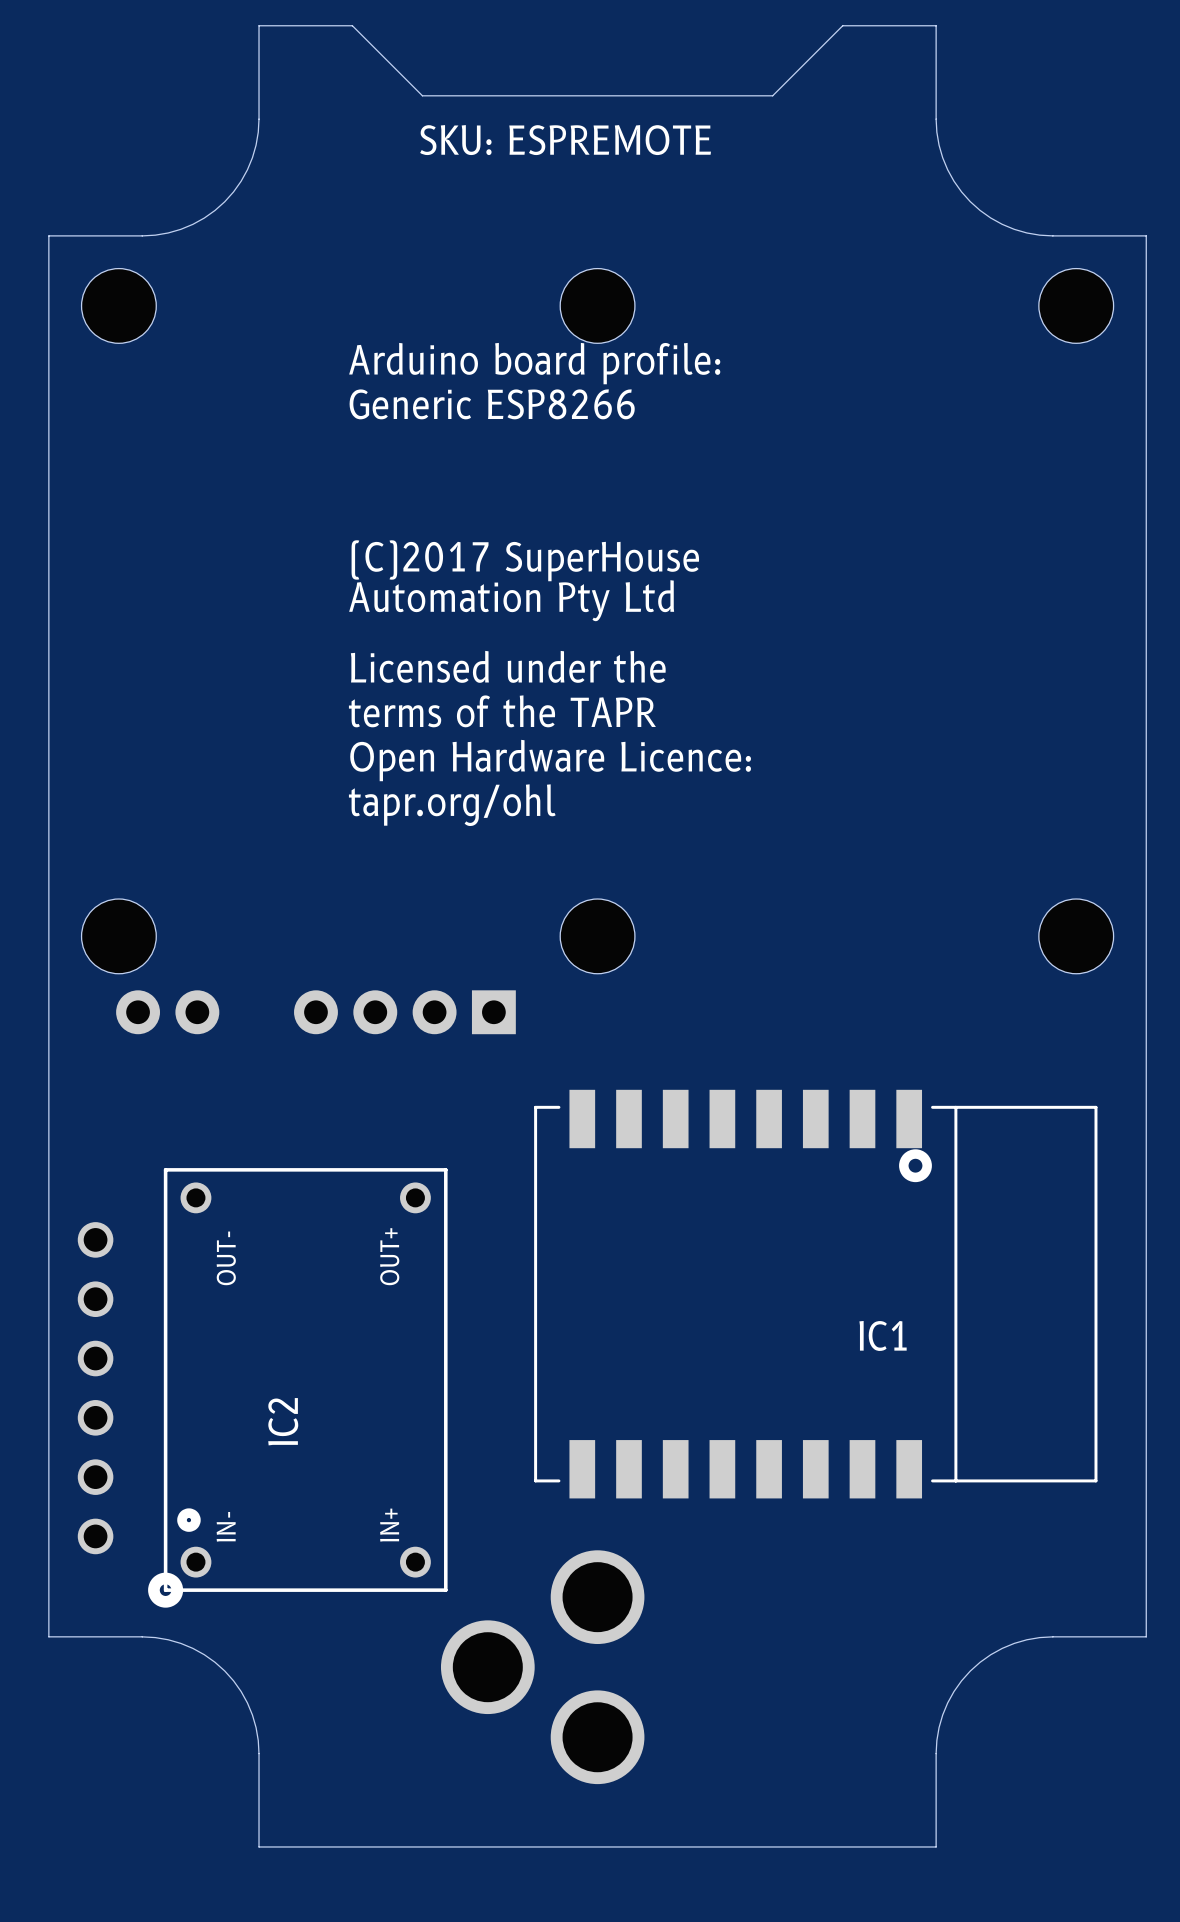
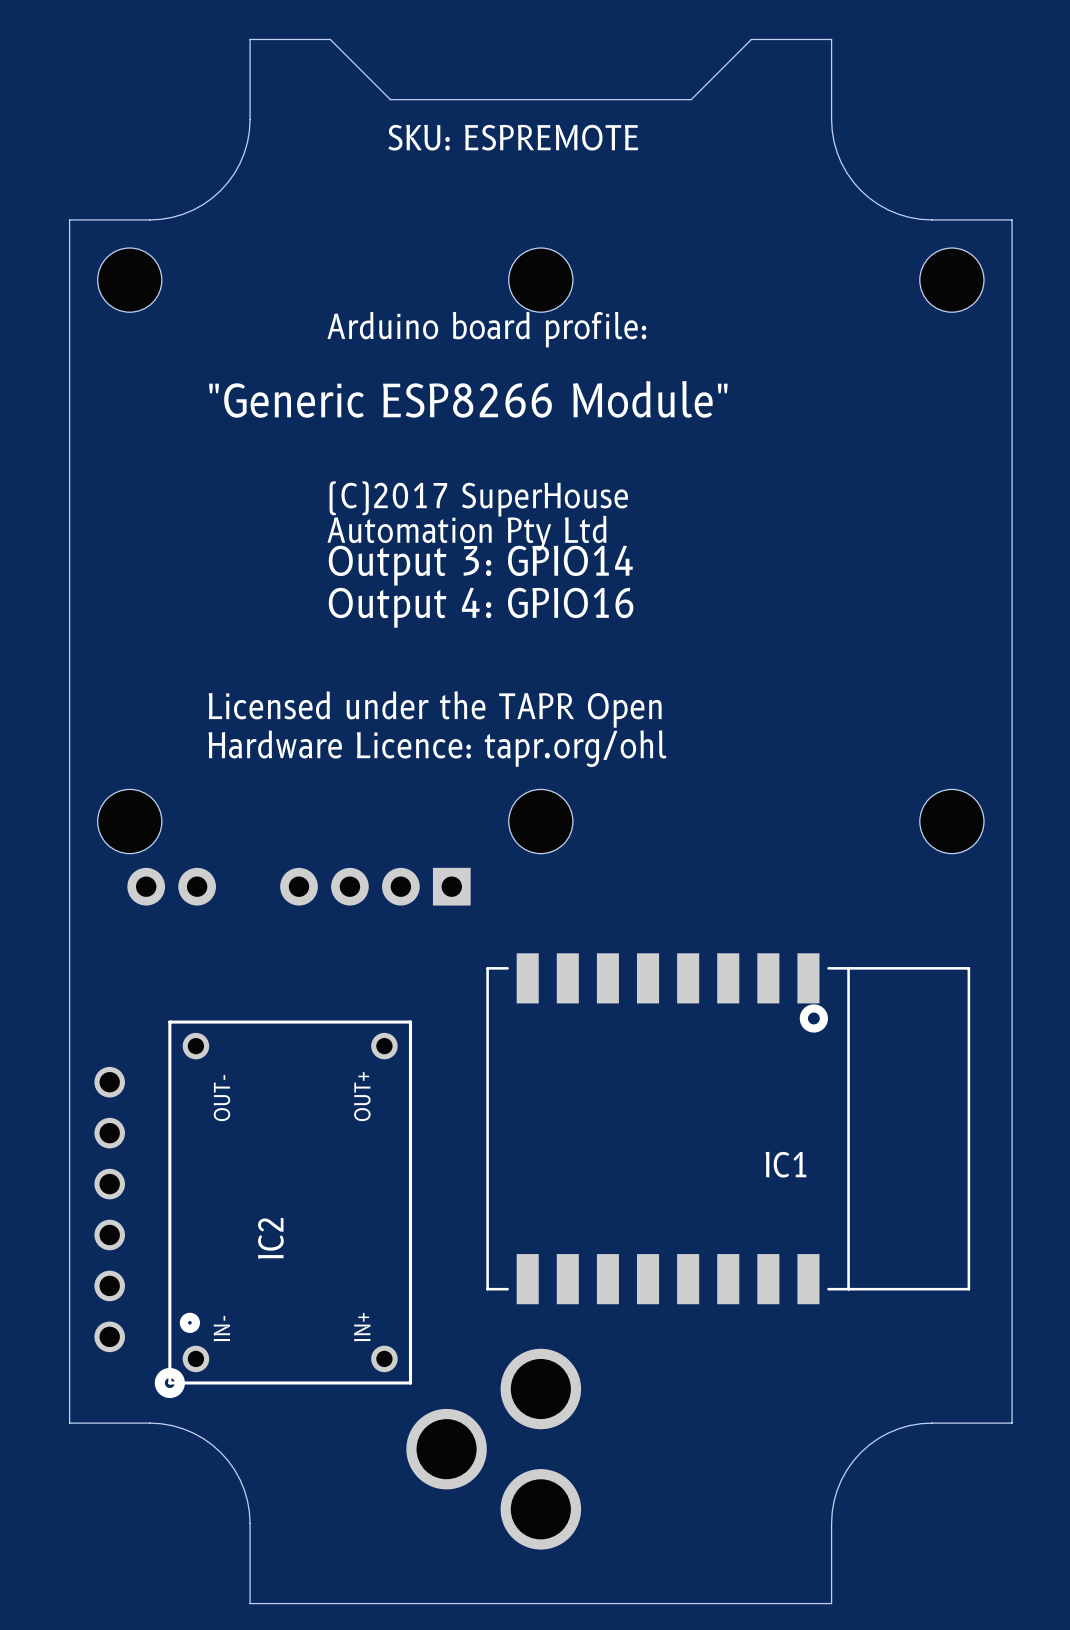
text: Generic ESP8266 (492, 404) -> "Generic ESP8266 Module" (468, 399)
text: none -> Output 3: GPIO14 (480, 565)
text: Licensed under the (508, 666) -> none
text: none -> Output 4: GPIO16 (481, 607)
text: terms of the TAPR (502, 711) -> none
text: Open Hardware Licence: (550, 760) -> none
text: tapr.org/ohl (452, 805) -> none
text: none -> Licensed under the TAPR Open (435, 709)
text: none -> Hardware Licence: tapr.org/ohl (437, 748)

